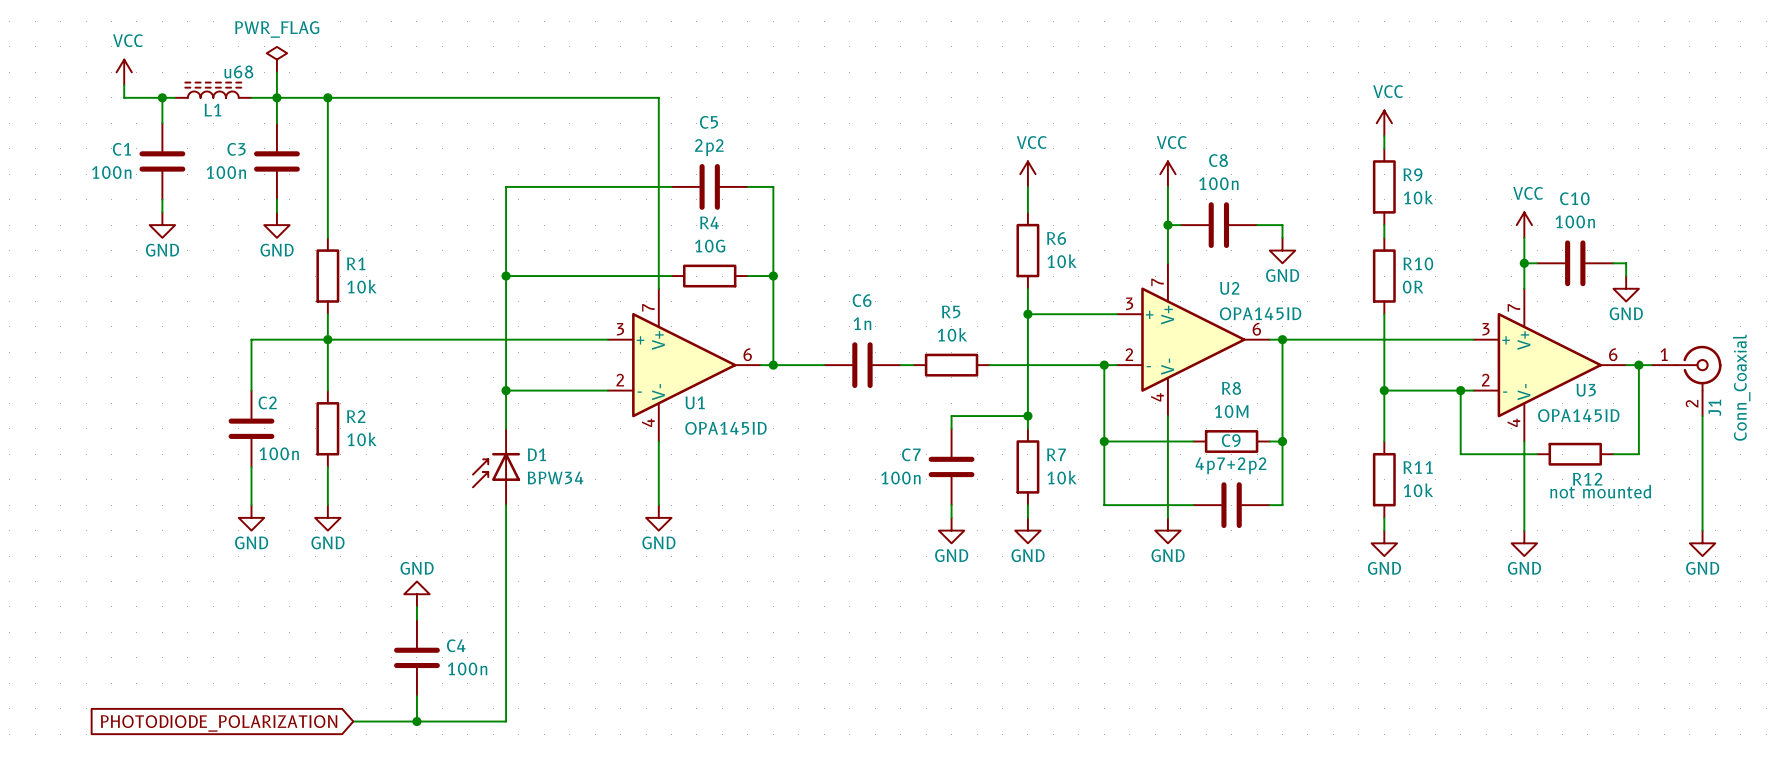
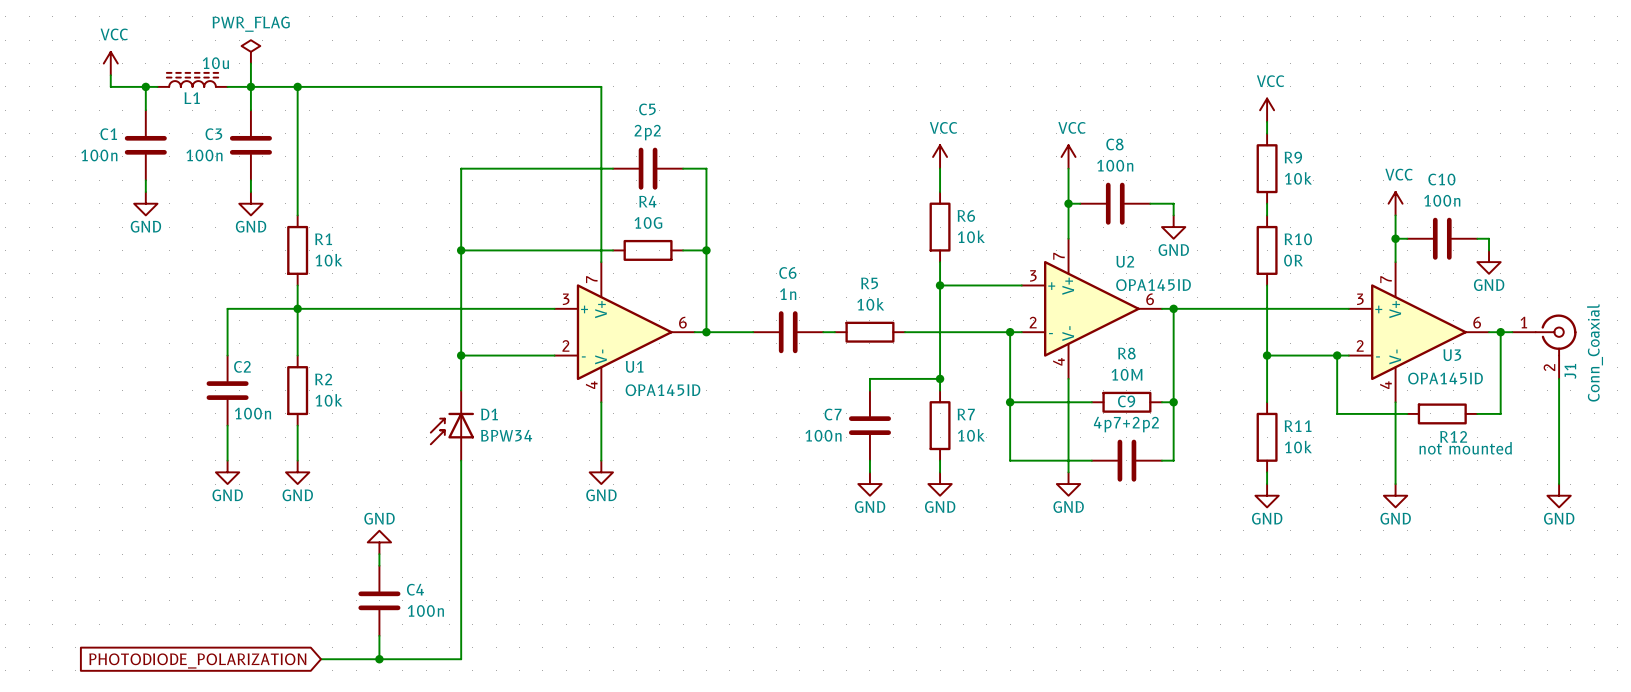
L1 value: u68 (238, 71) -> 10u (215, 63)

